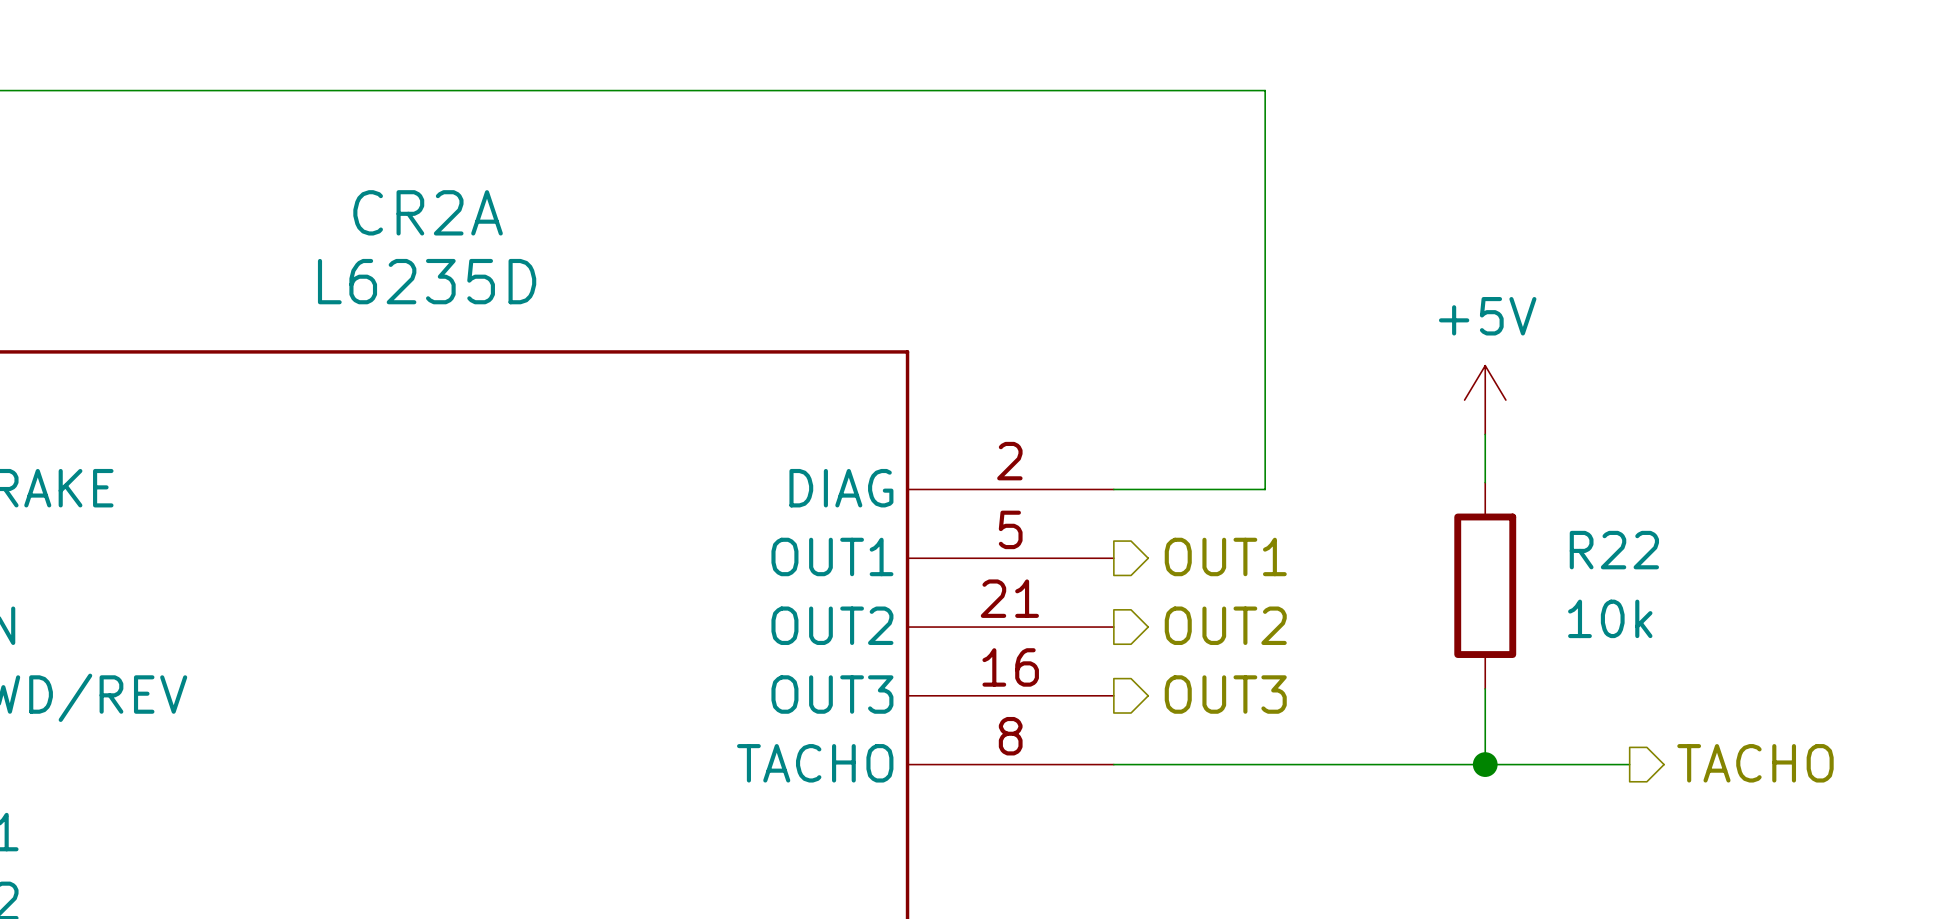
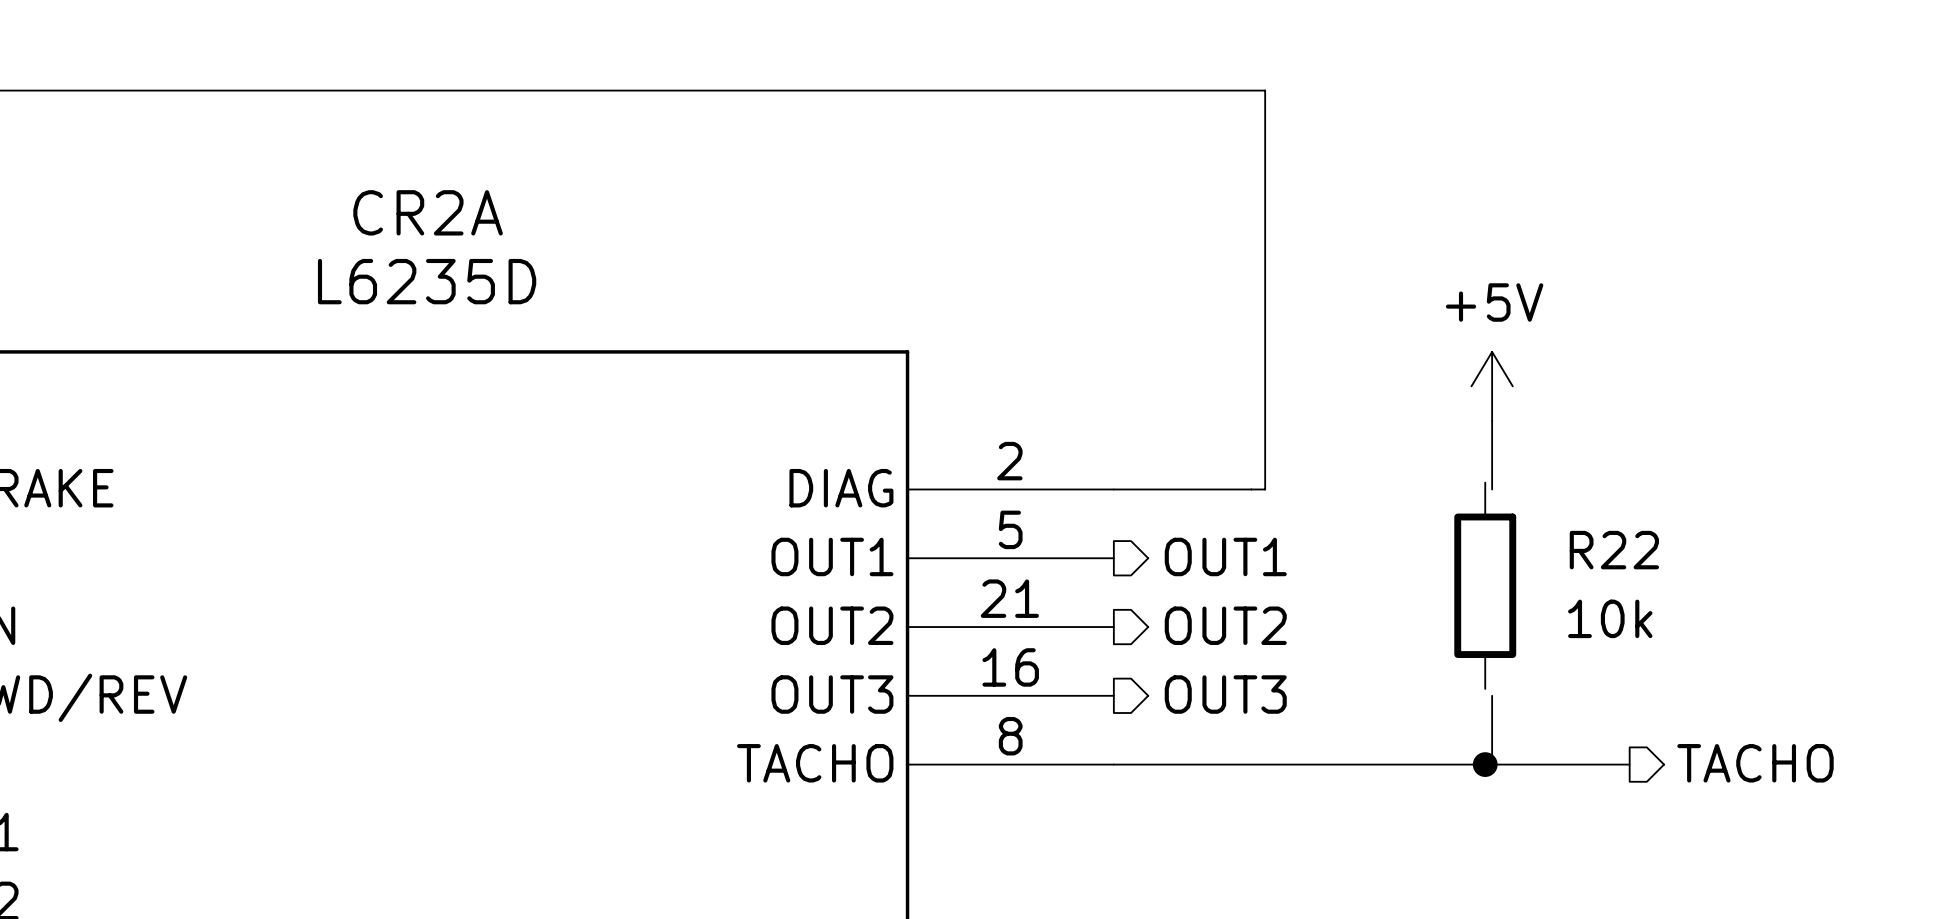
power symbol position: +5V (1485, 400) -> +5V (1492, 386)
wire: none -> (1492, 420) (1492, 489)
wire: (1485, 434) (1485, 482) -> none
wire: (1485, 688) (1485, 764) -> none
wire: none -> (1492, 695) (1492, 764)

